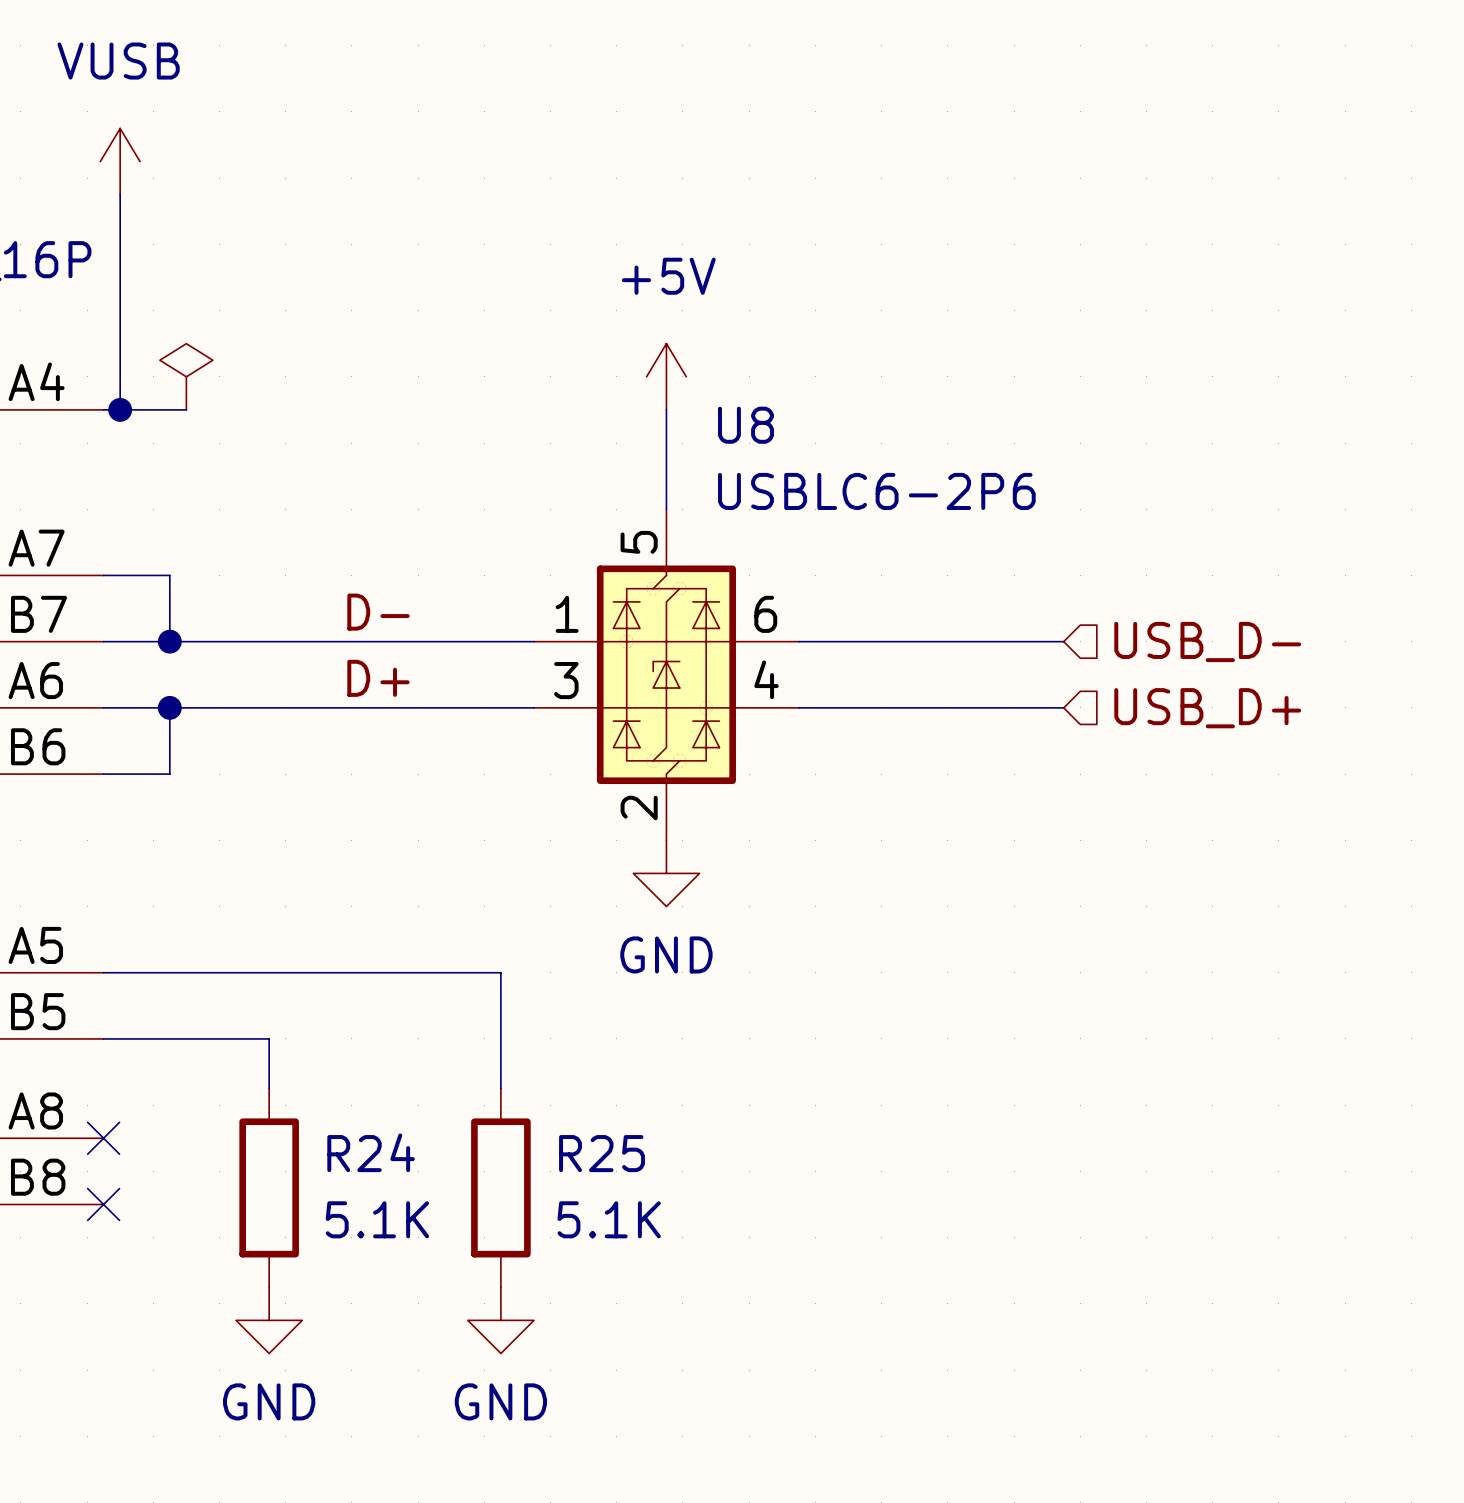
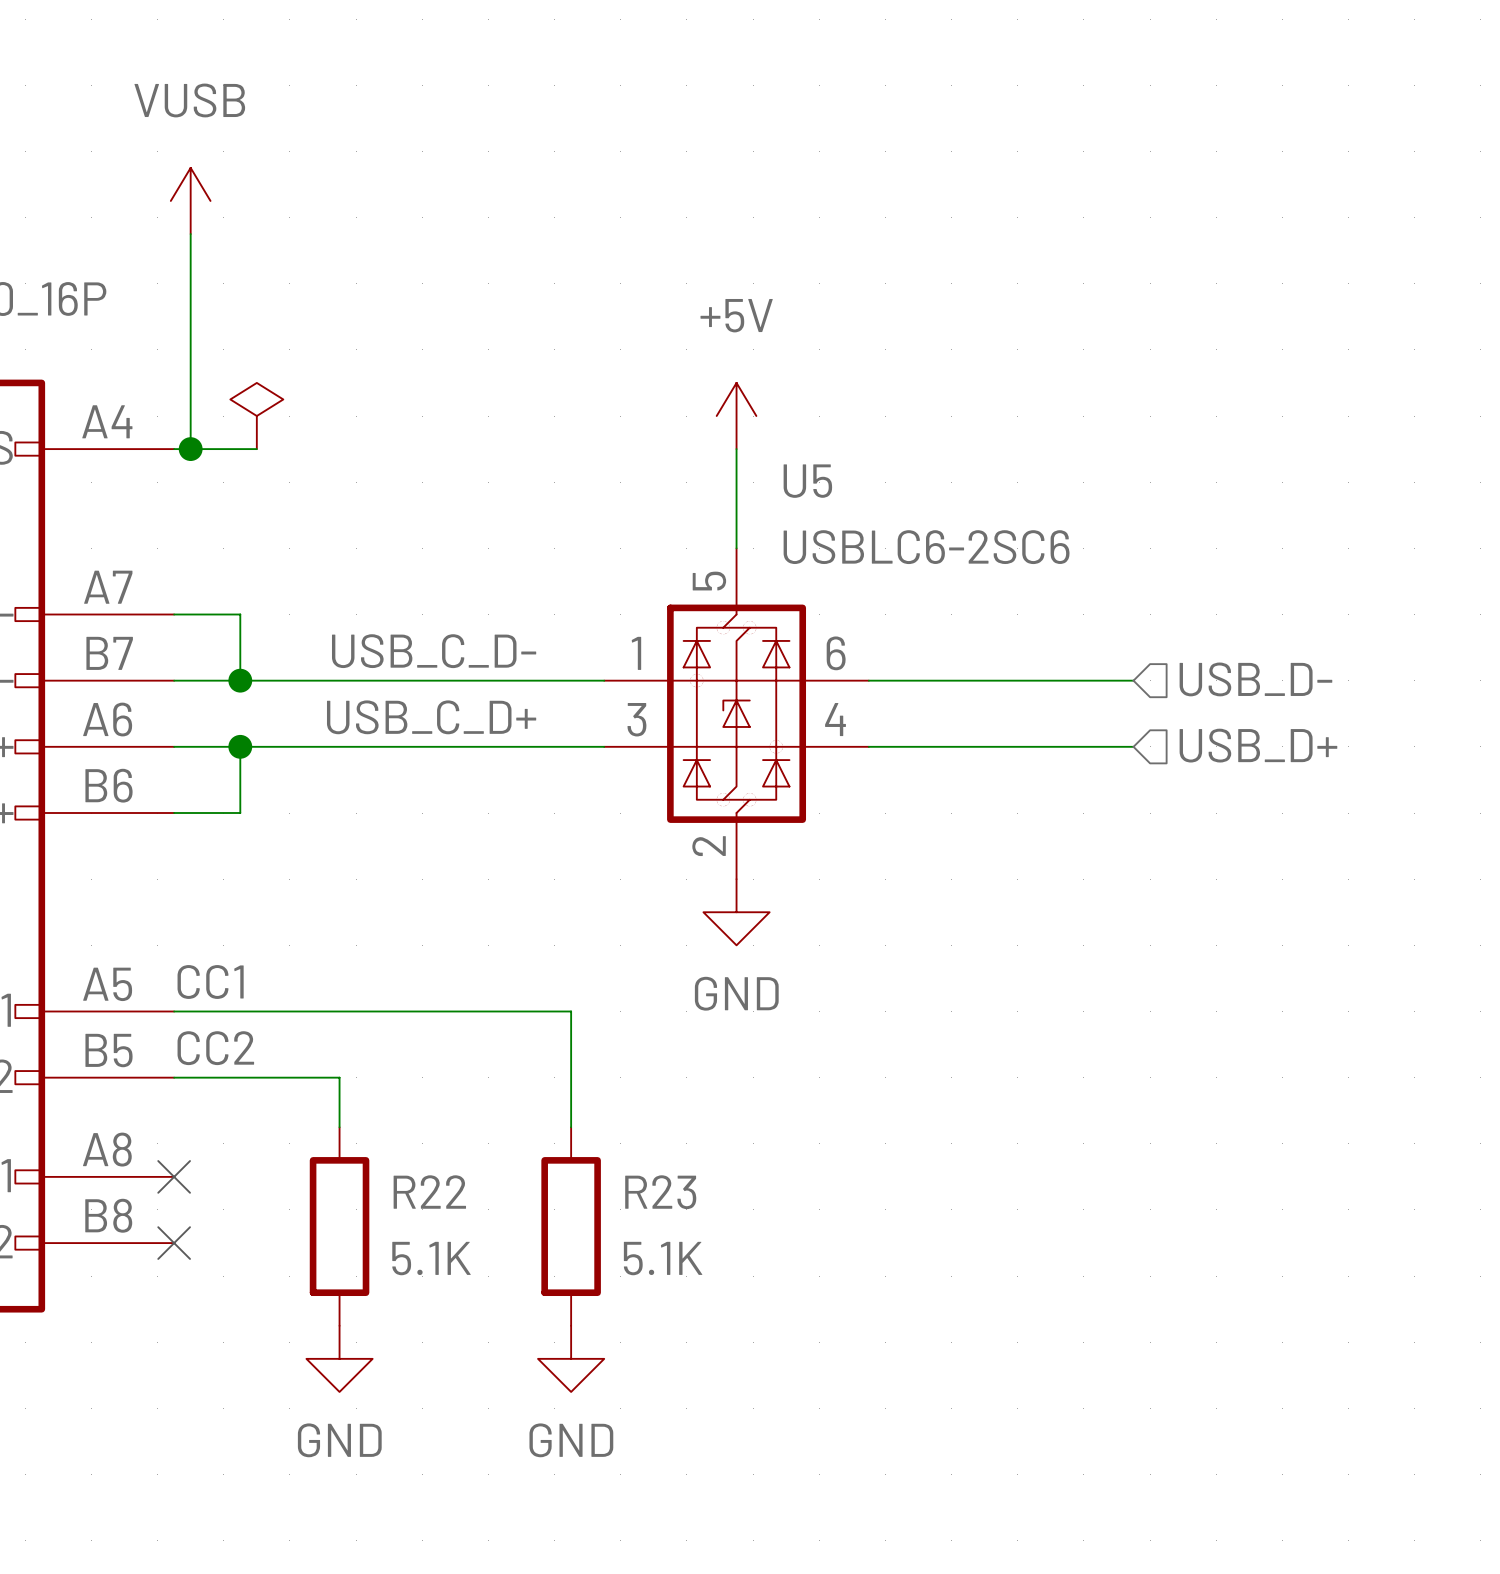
U8 name: U8 (745, 425) -> U5 (807, 481)
U8 value: USBLC6-2P6 (876, 491) -> USBLC6-2SC6 (926, 547)
label: D- (378, 612) -> none
label: none -> USB_C_D- (434, 651)
label: D+ (378, 678) -> none
label: none -> USB_C_D+ (431, 717)
label: none -> CC1 (210, 982)
label: none -> CC2 (215, 1048)
R24 name: R24 (371, 1152) -> R22 (429, 1192)
R25 name: R25 (602, 1153) -> R23 (660, 1192)

